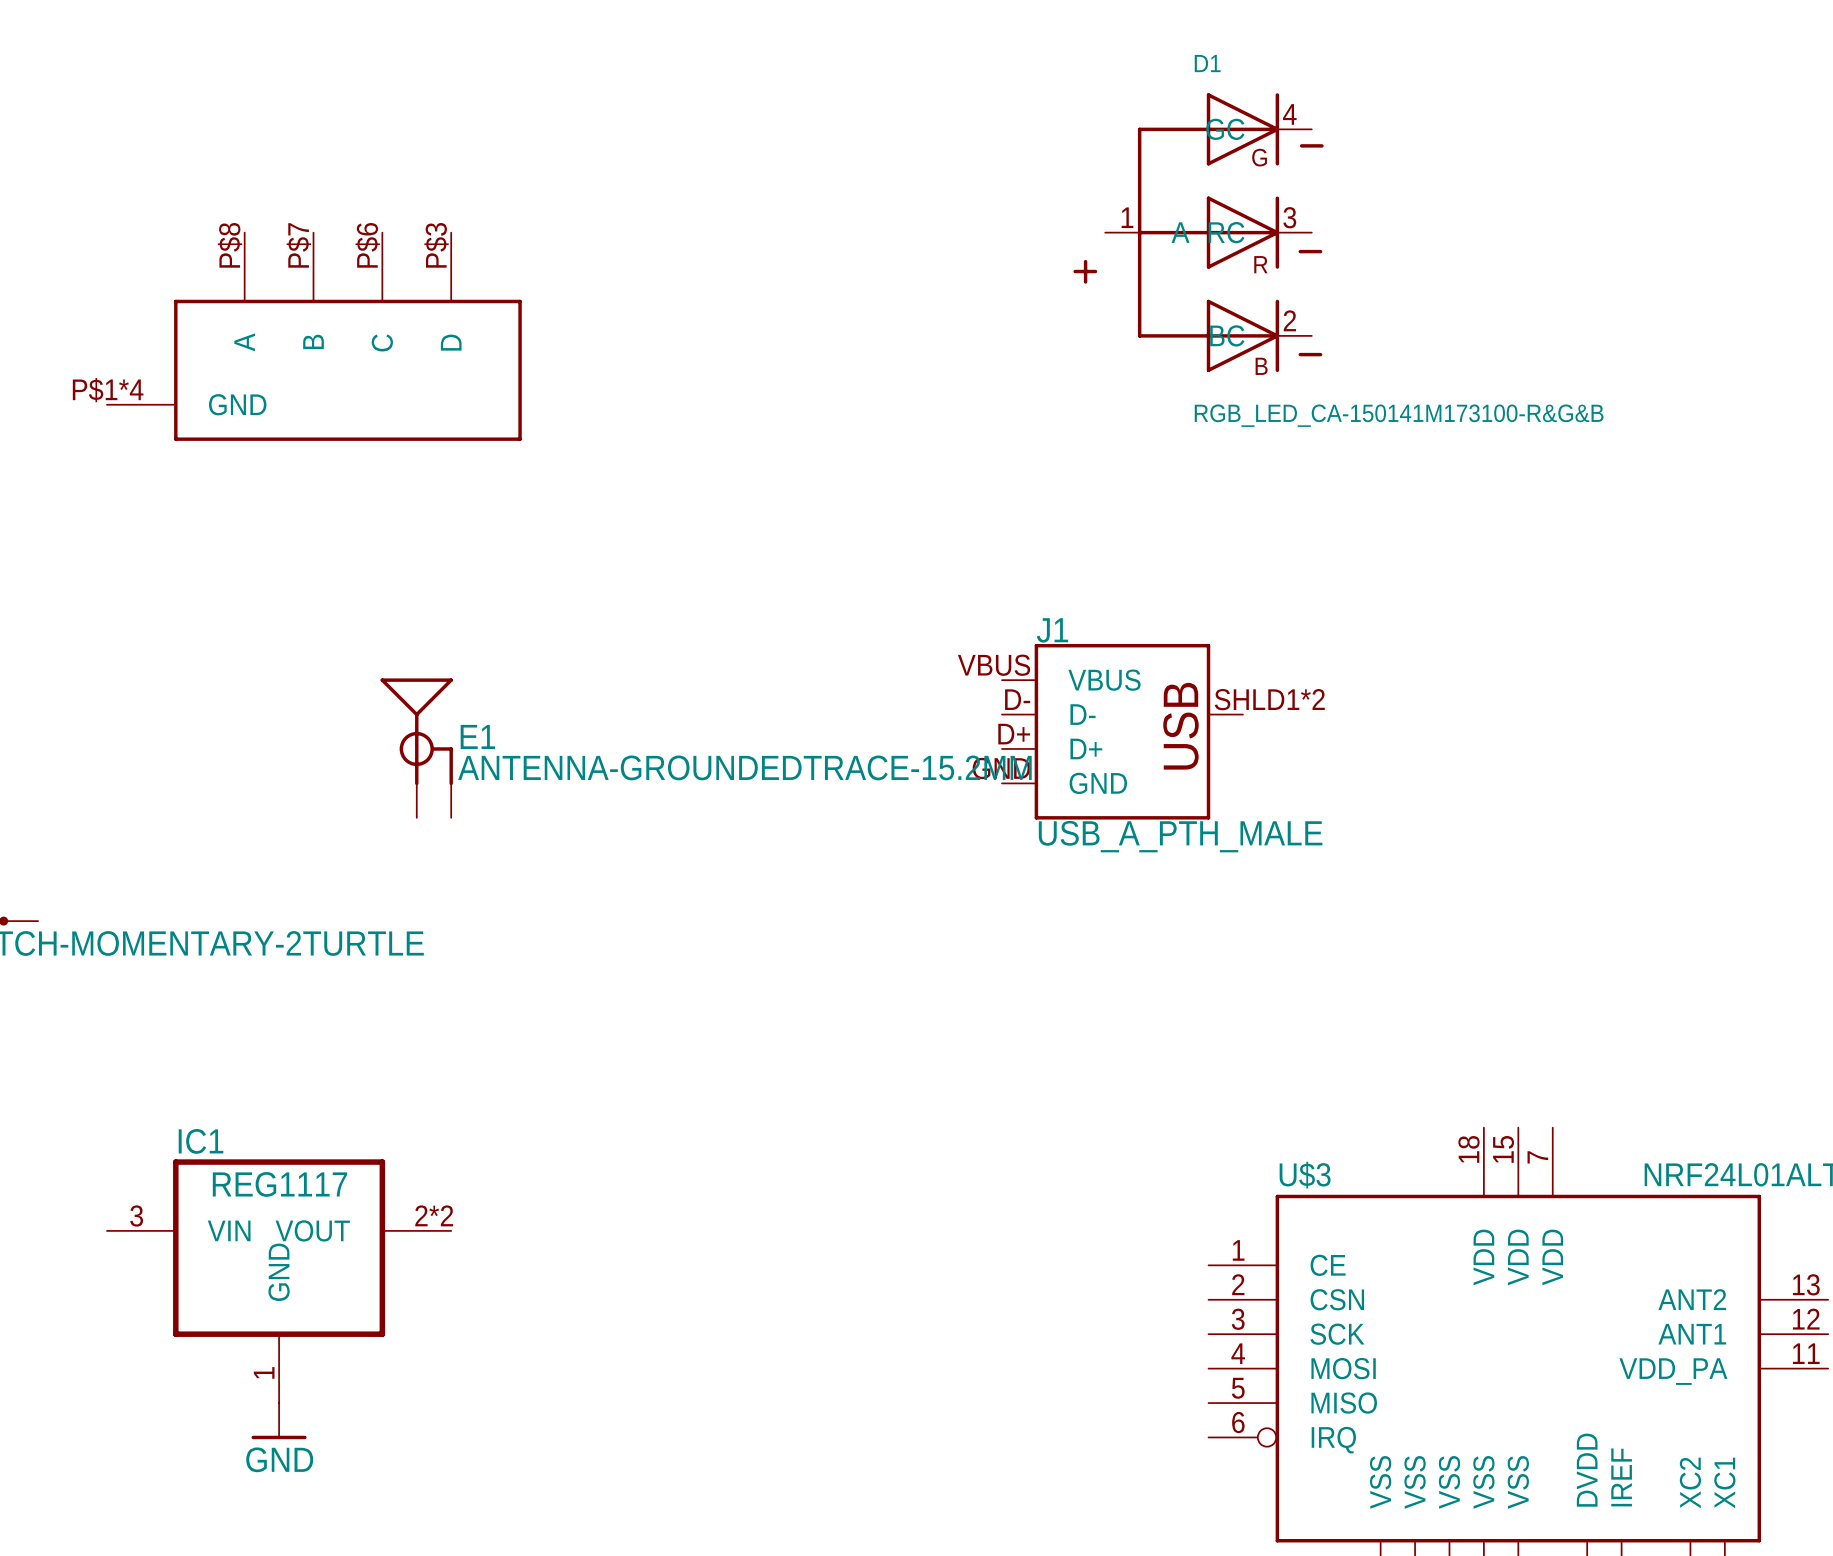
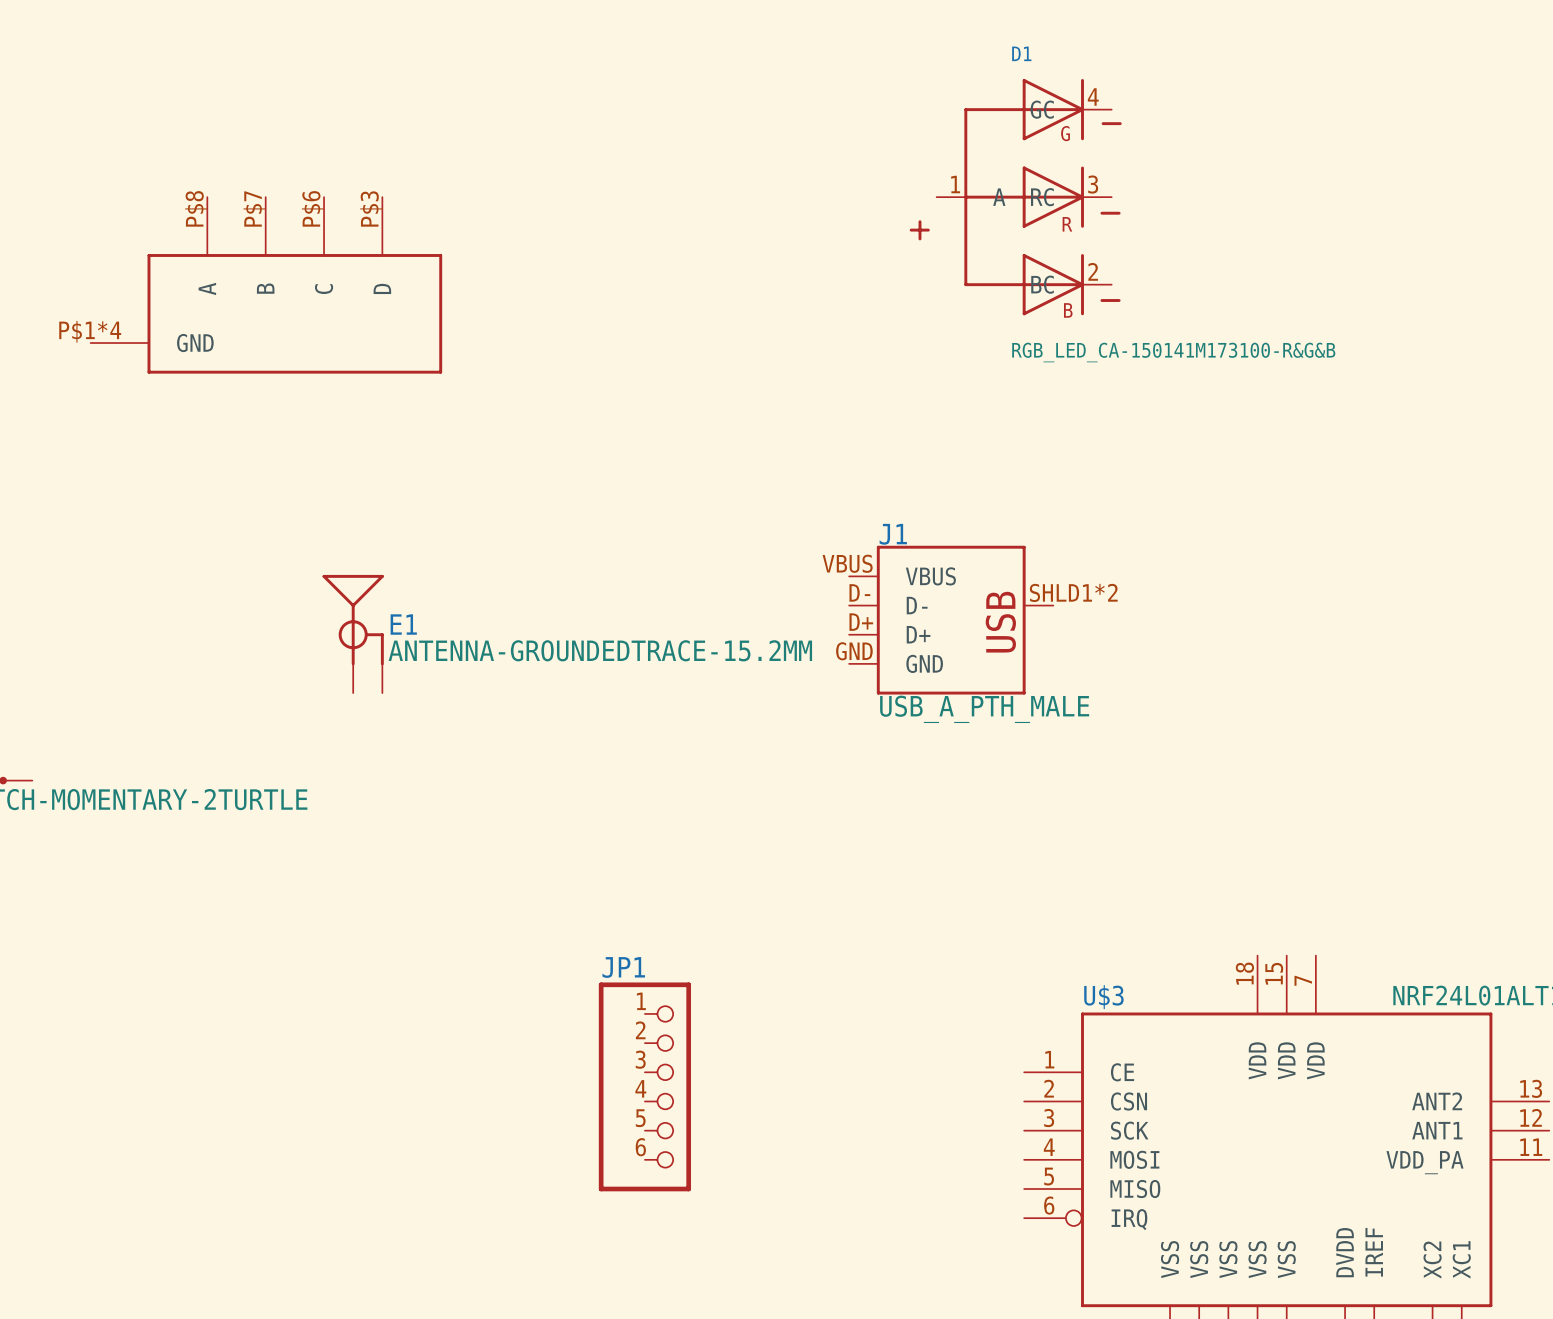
IC1: REG1117 (279, 1281) -> none
JP1: none -> (644, 1086)
power symbol: GND (279, 1421) -> none

